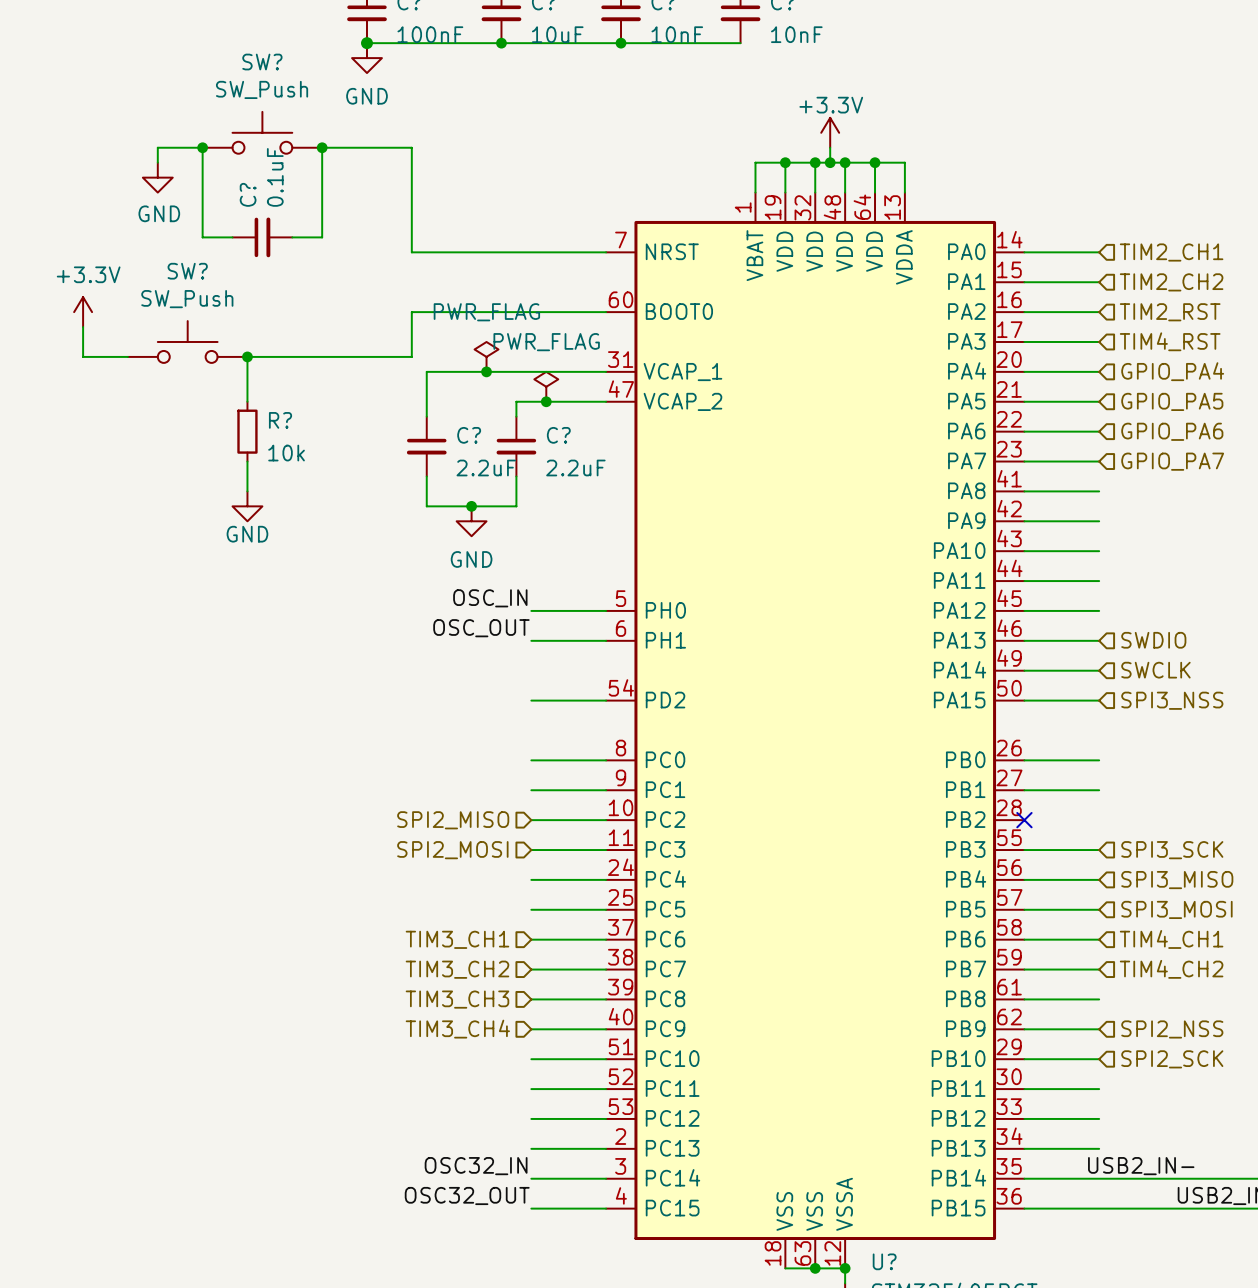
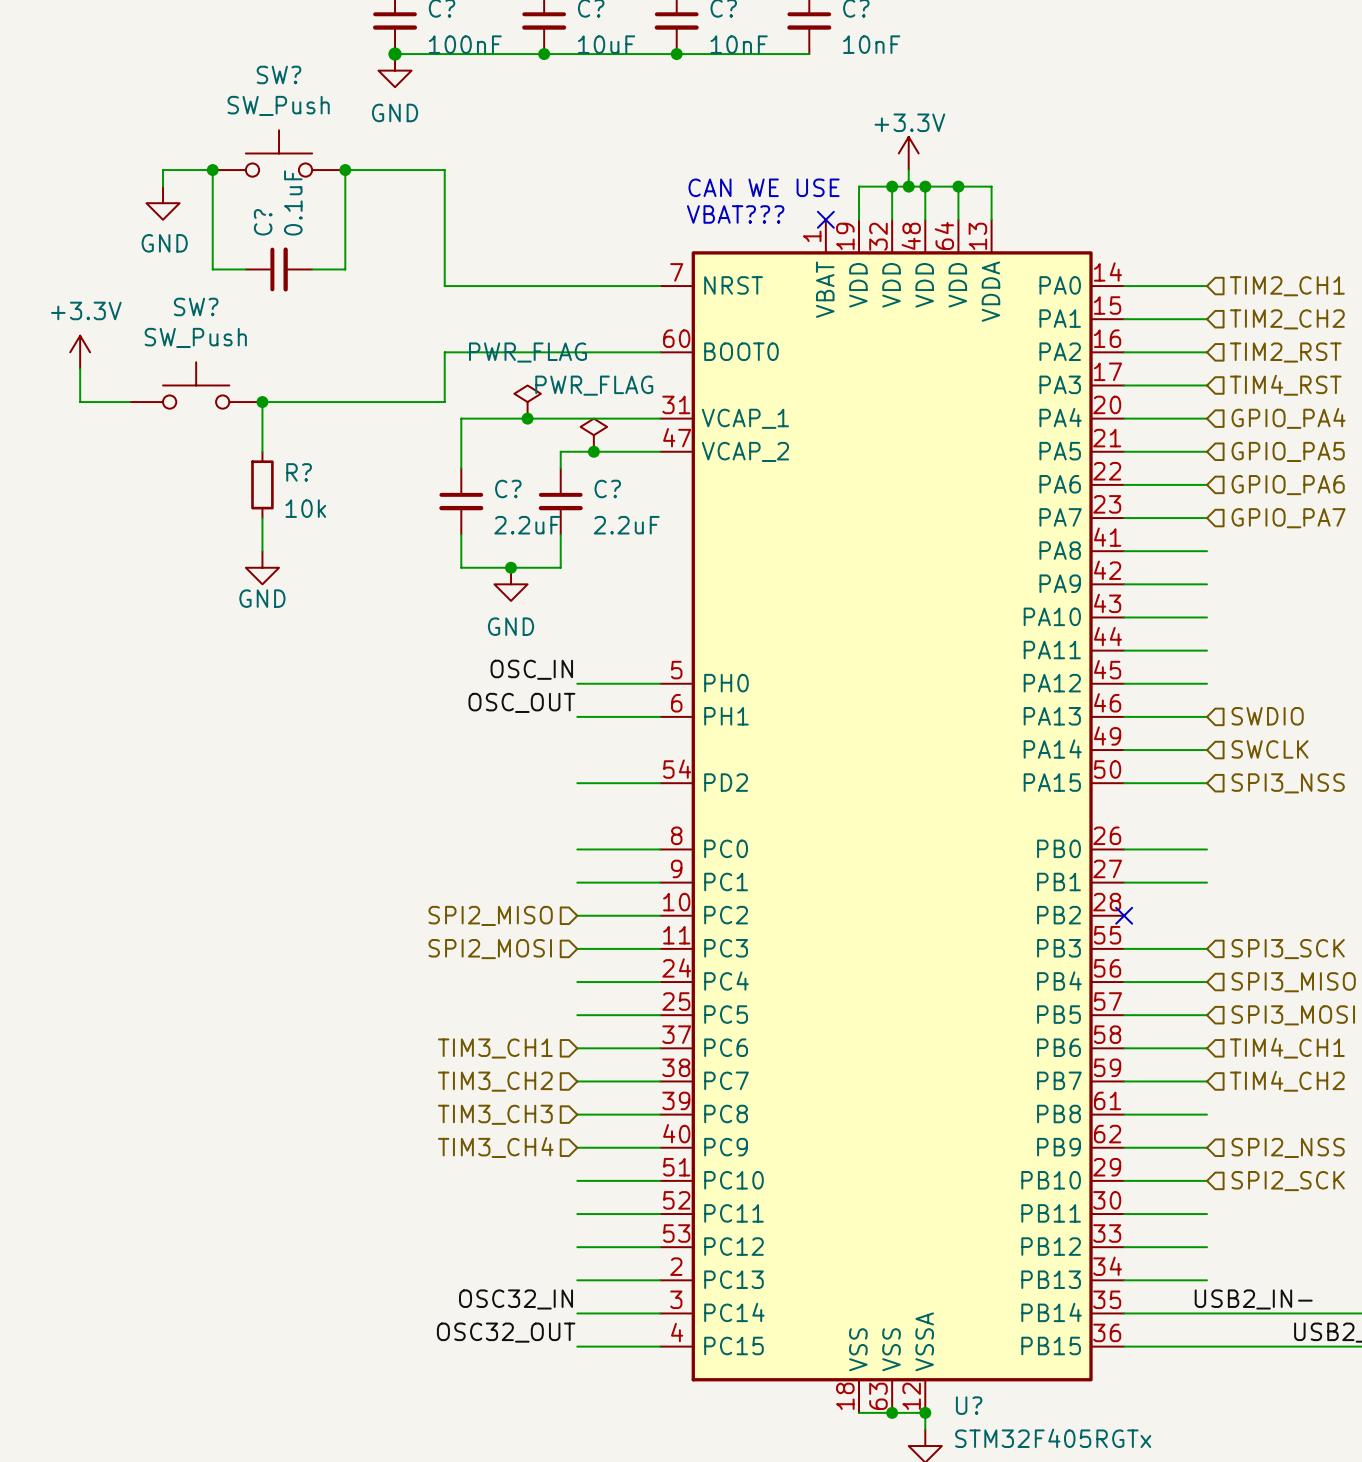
wire: (785, 162) (755, 162) (755, 192) -> none
junction: (785, 162) -> none
text: none -> CAN WE USE (764, 187)
text: none -> VBAT??? (735, 214)
no-connect mark: none -> (825, 219)

